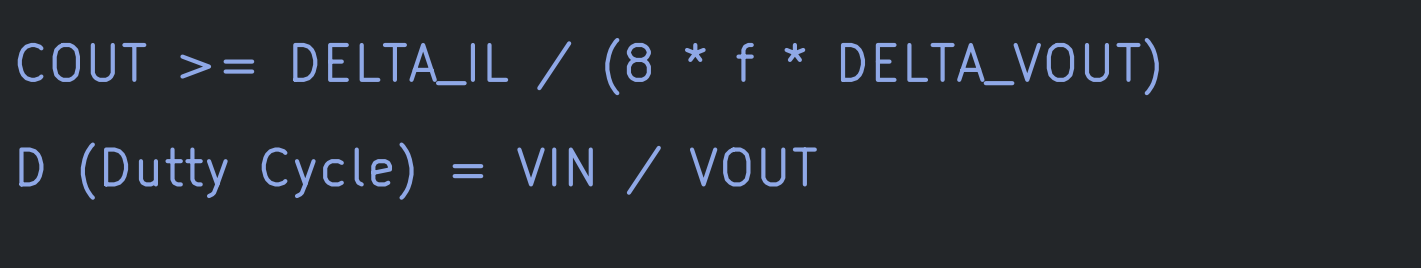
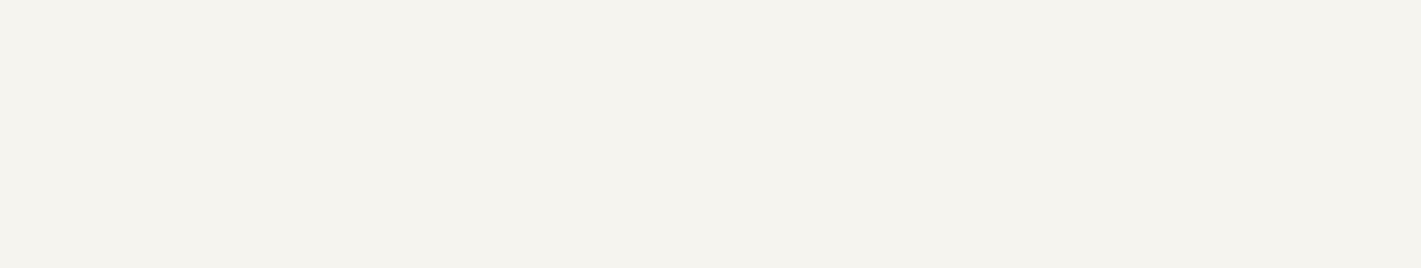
text: COUT >= DELTA_IL / (8 * f * DELTA_VOUT) (588, 66) -> none
text: D (Dutty Cycle) = VIN / VOUT (418, 171) -> none

